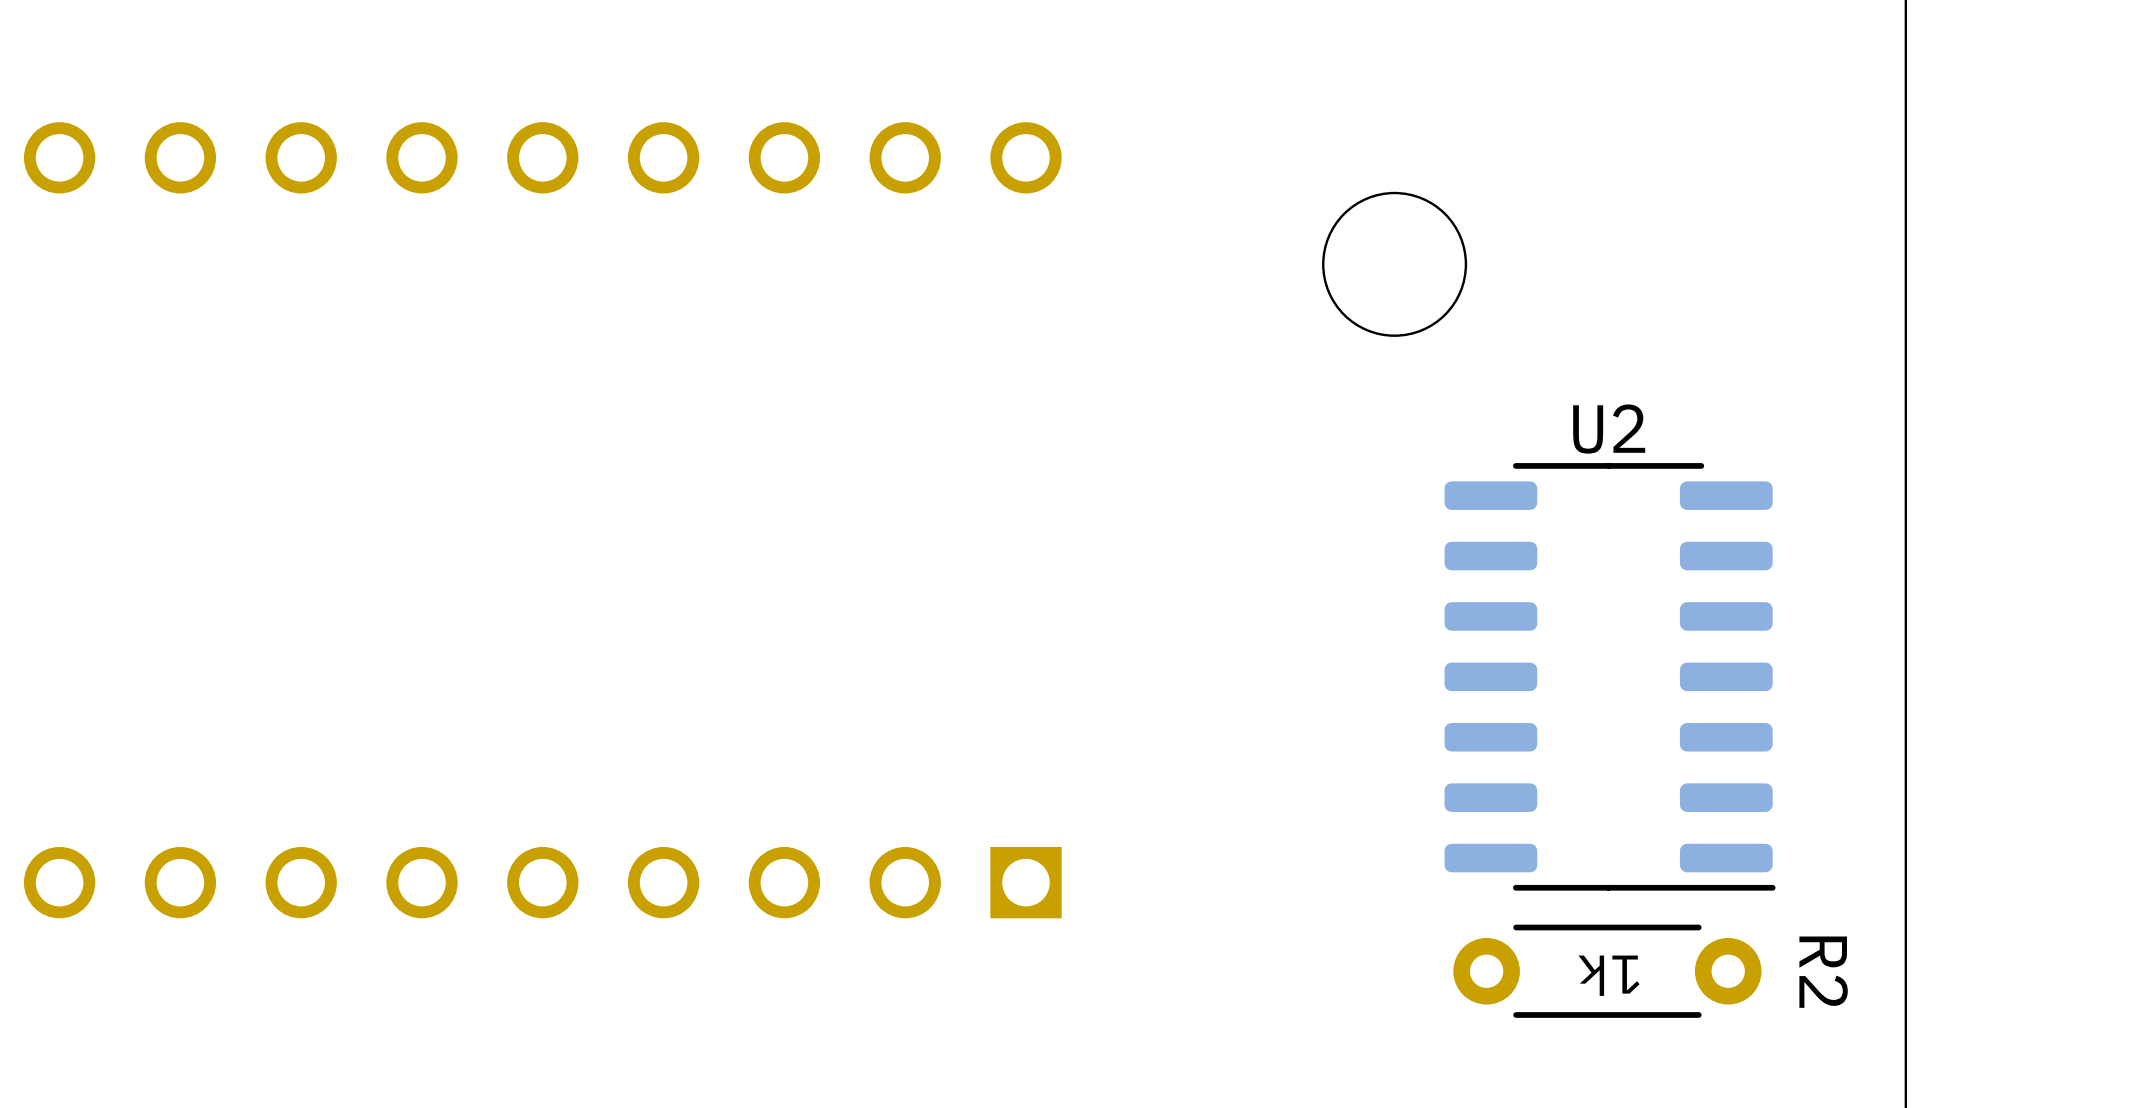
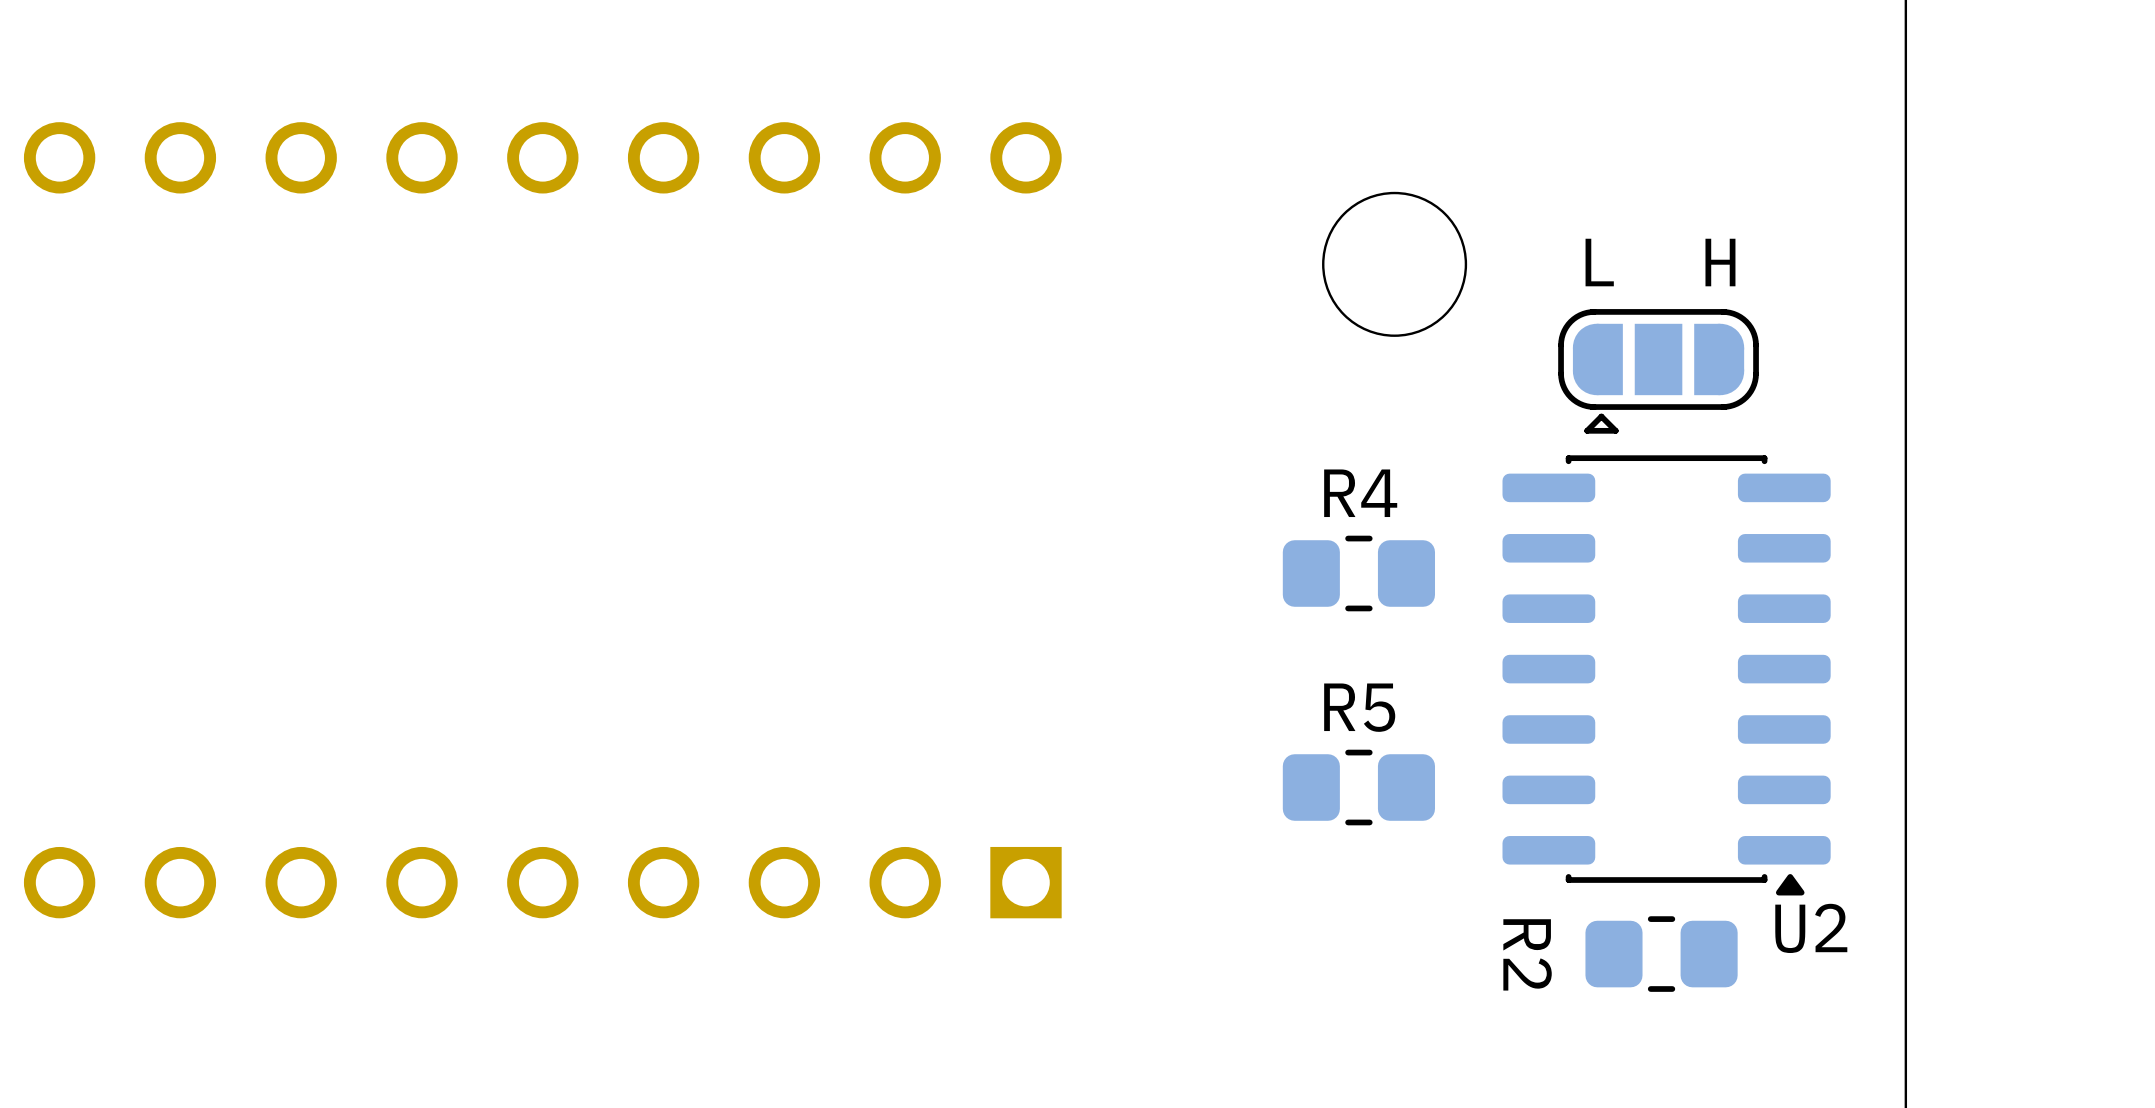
text: none -> L H (1660, 262)
part: none -> (1658, 371)
U2 name position: U2 (1609, 429) -> U2 (1811, 928)
U2 footprint: [1444, 463, 1776, 891] -> [1502, 455, 1831, 896]
R4: none -> (1358, 573)
R5: none -> (1358, 787)
R2 footprint: [1453, 924, 1762, 1018] -> [1585, 916, 1738, 992]
R2 name position: R2 (1823, 972) -> R2 (1527, 954)
text: 1k (1609, 975) -> none

